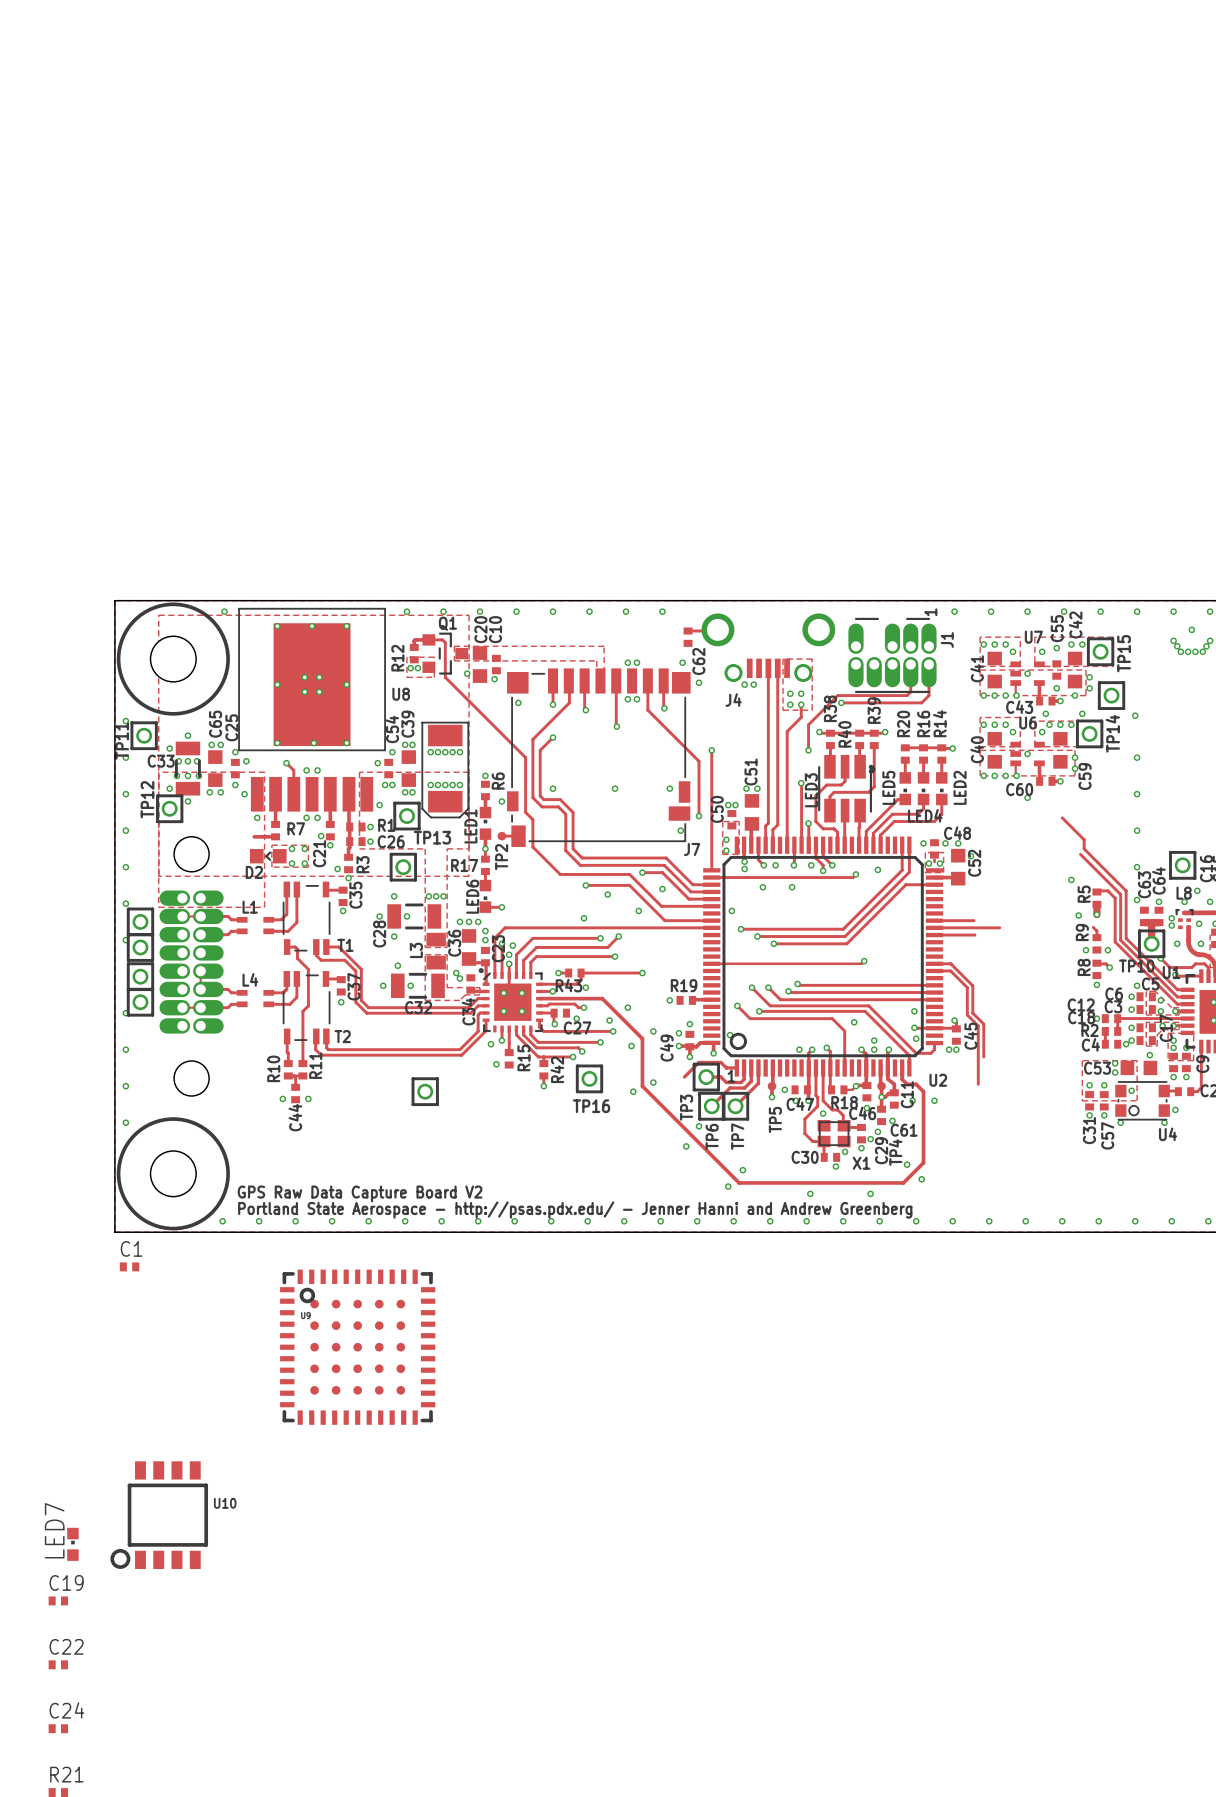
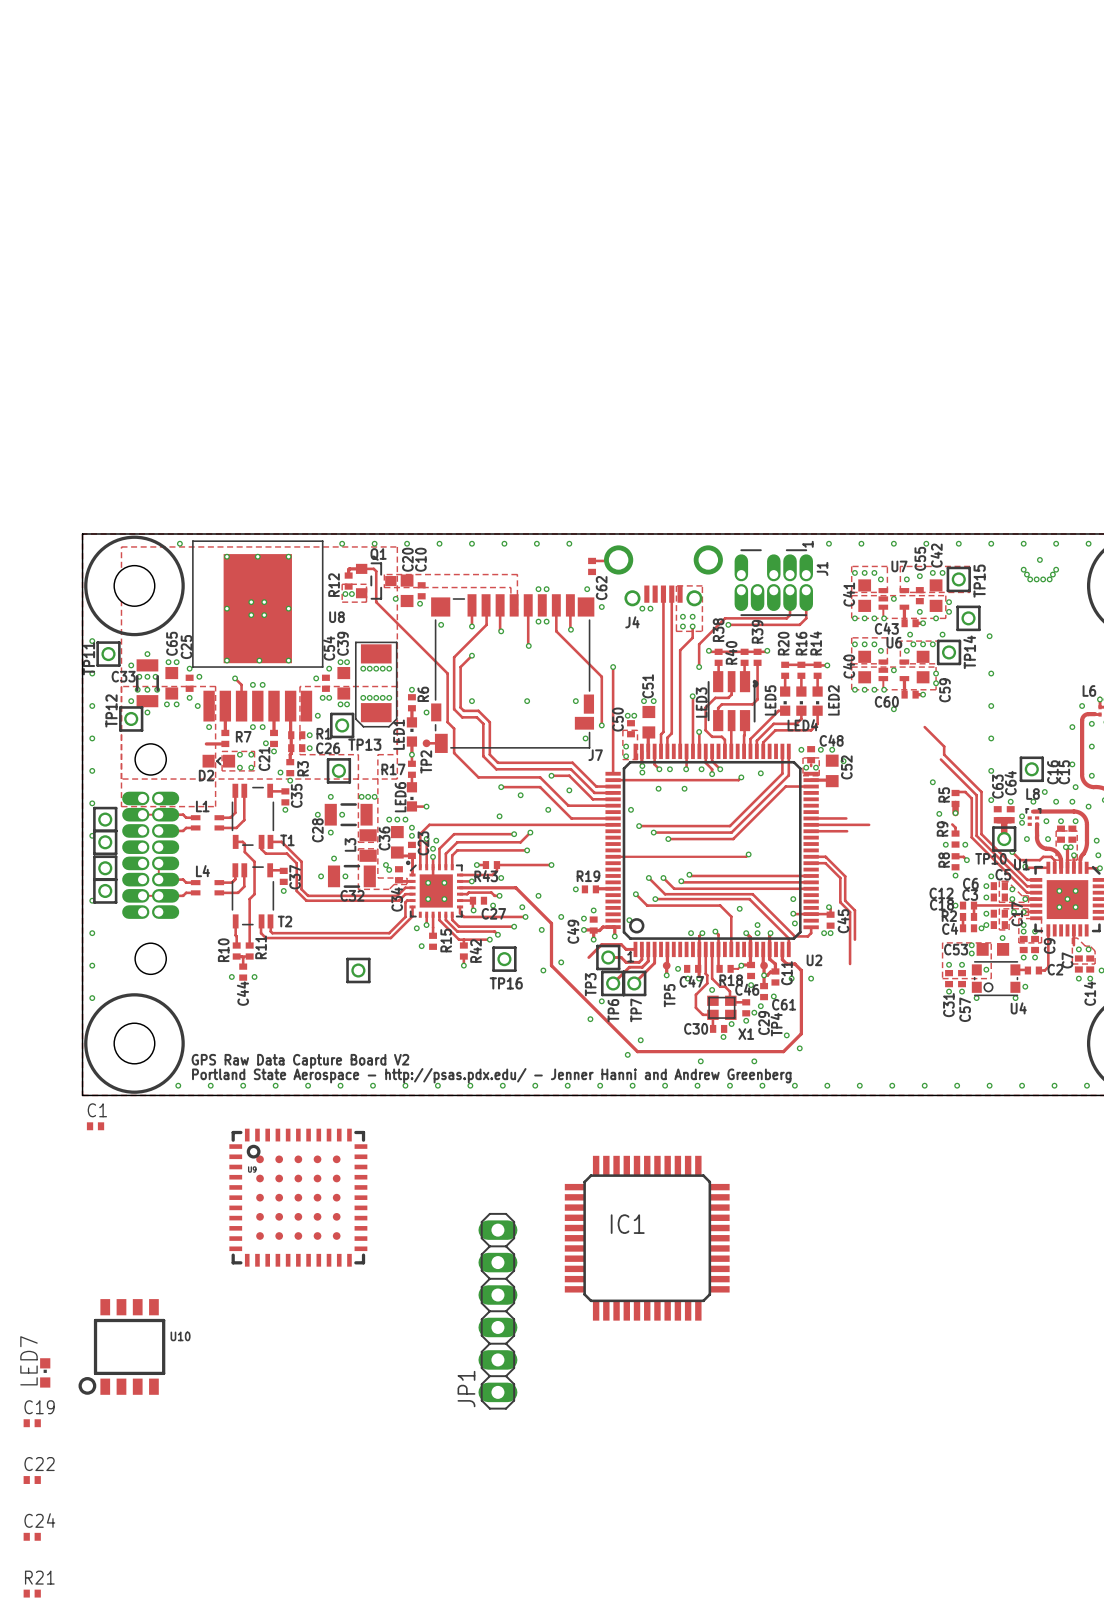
IC1: none -> (647, 1238)
JP1: none -> (497, 1311)

